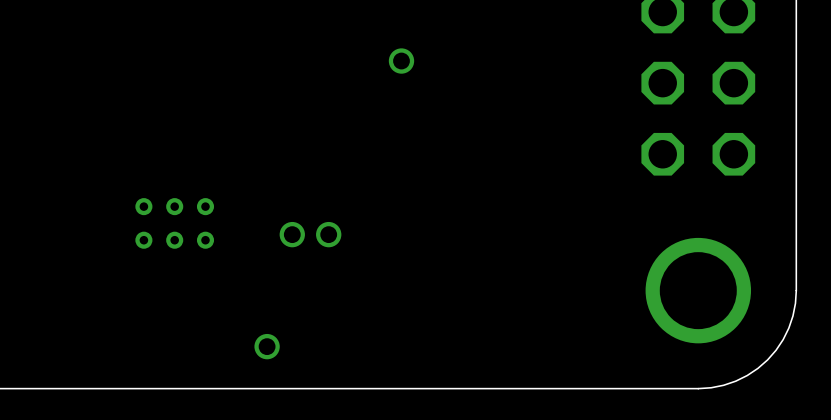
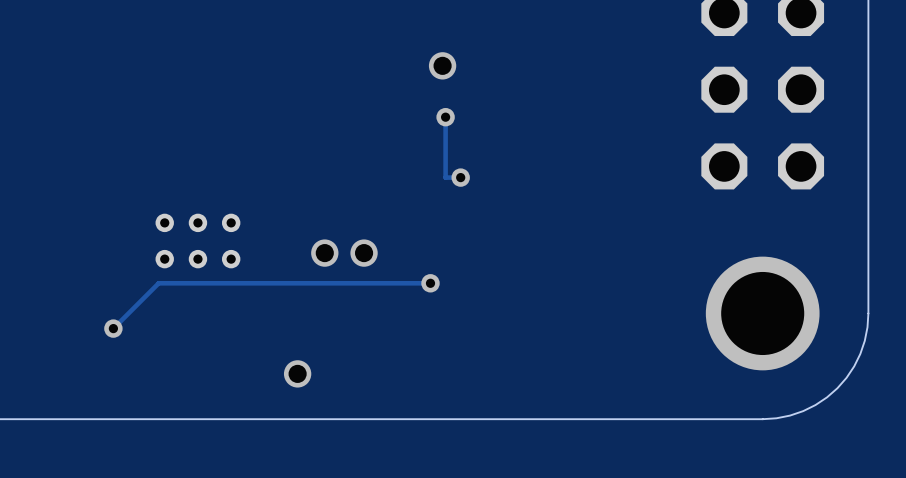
track: none -> (445, 117) (445, 177) (460, 177)
via: none -> (445, 117)
via: none -> (460, 177)
track: none -> (430, 283) (158, 283) (113, 328)
via: none -> (430, 283)
via: none -> (113, 328)

